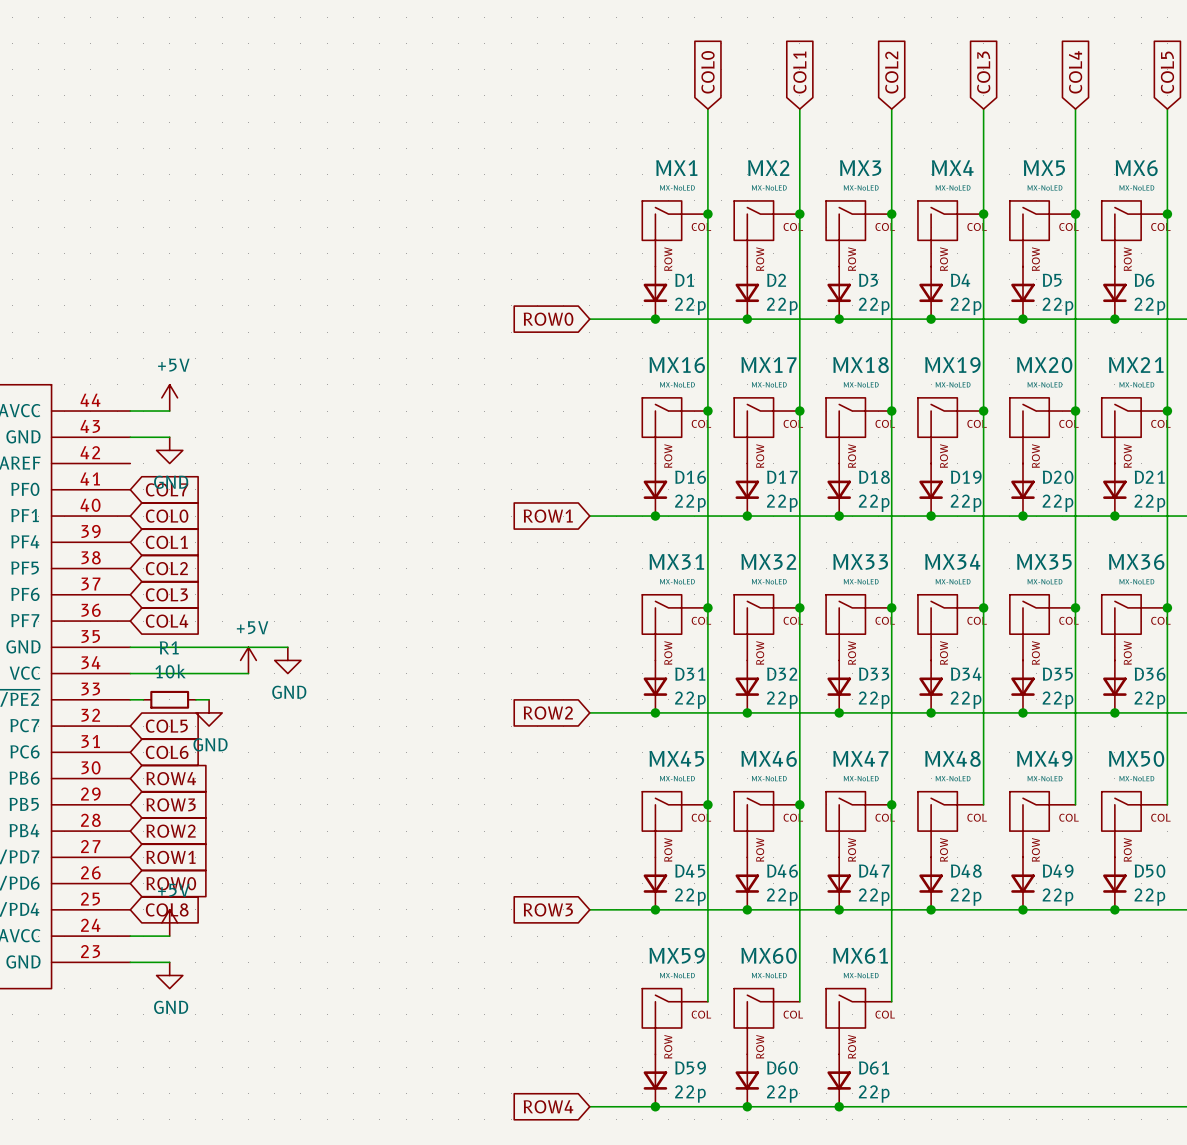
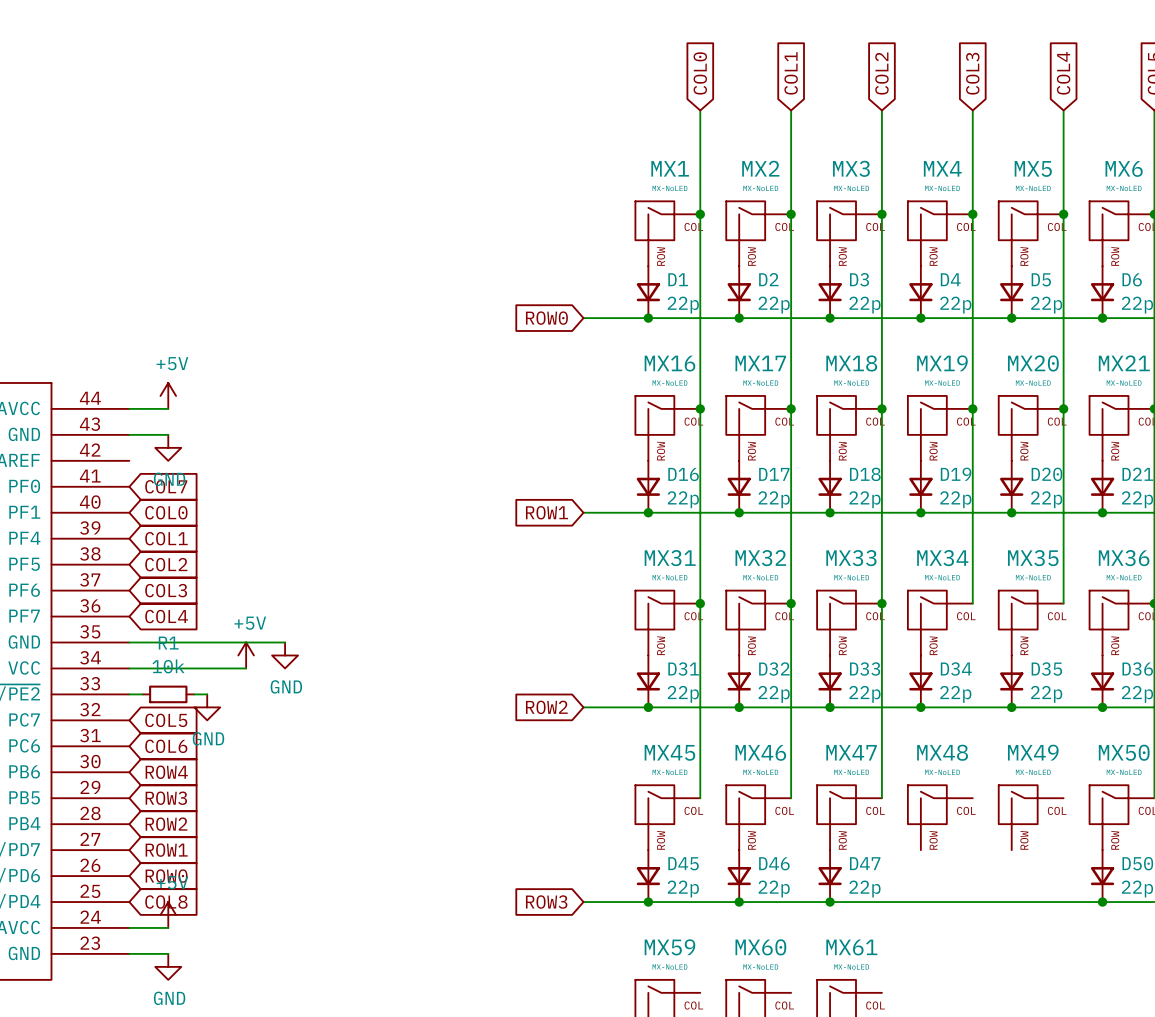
wire: (983, 607) (983, 804) -> none
junction: (983, 607) -> none
wire: (1075, 607) (1075, 804) -> none
junction: (1075, 607) -> none
wire: (707, 804) (707, 1001) -> none
junction: (707, 804) -> none
wire: (799, 804) (799, 1001) -> none
junction: (799, 804) -> none
wire: (891, 804) (891, 1001) -> none
junction: (891, 804) -> none
D48: 22p (931, 883) -> none
D49: 22p (1022, 883) -> none
junction: (931, 909) -> none
junction: (1022, 909) -> none

